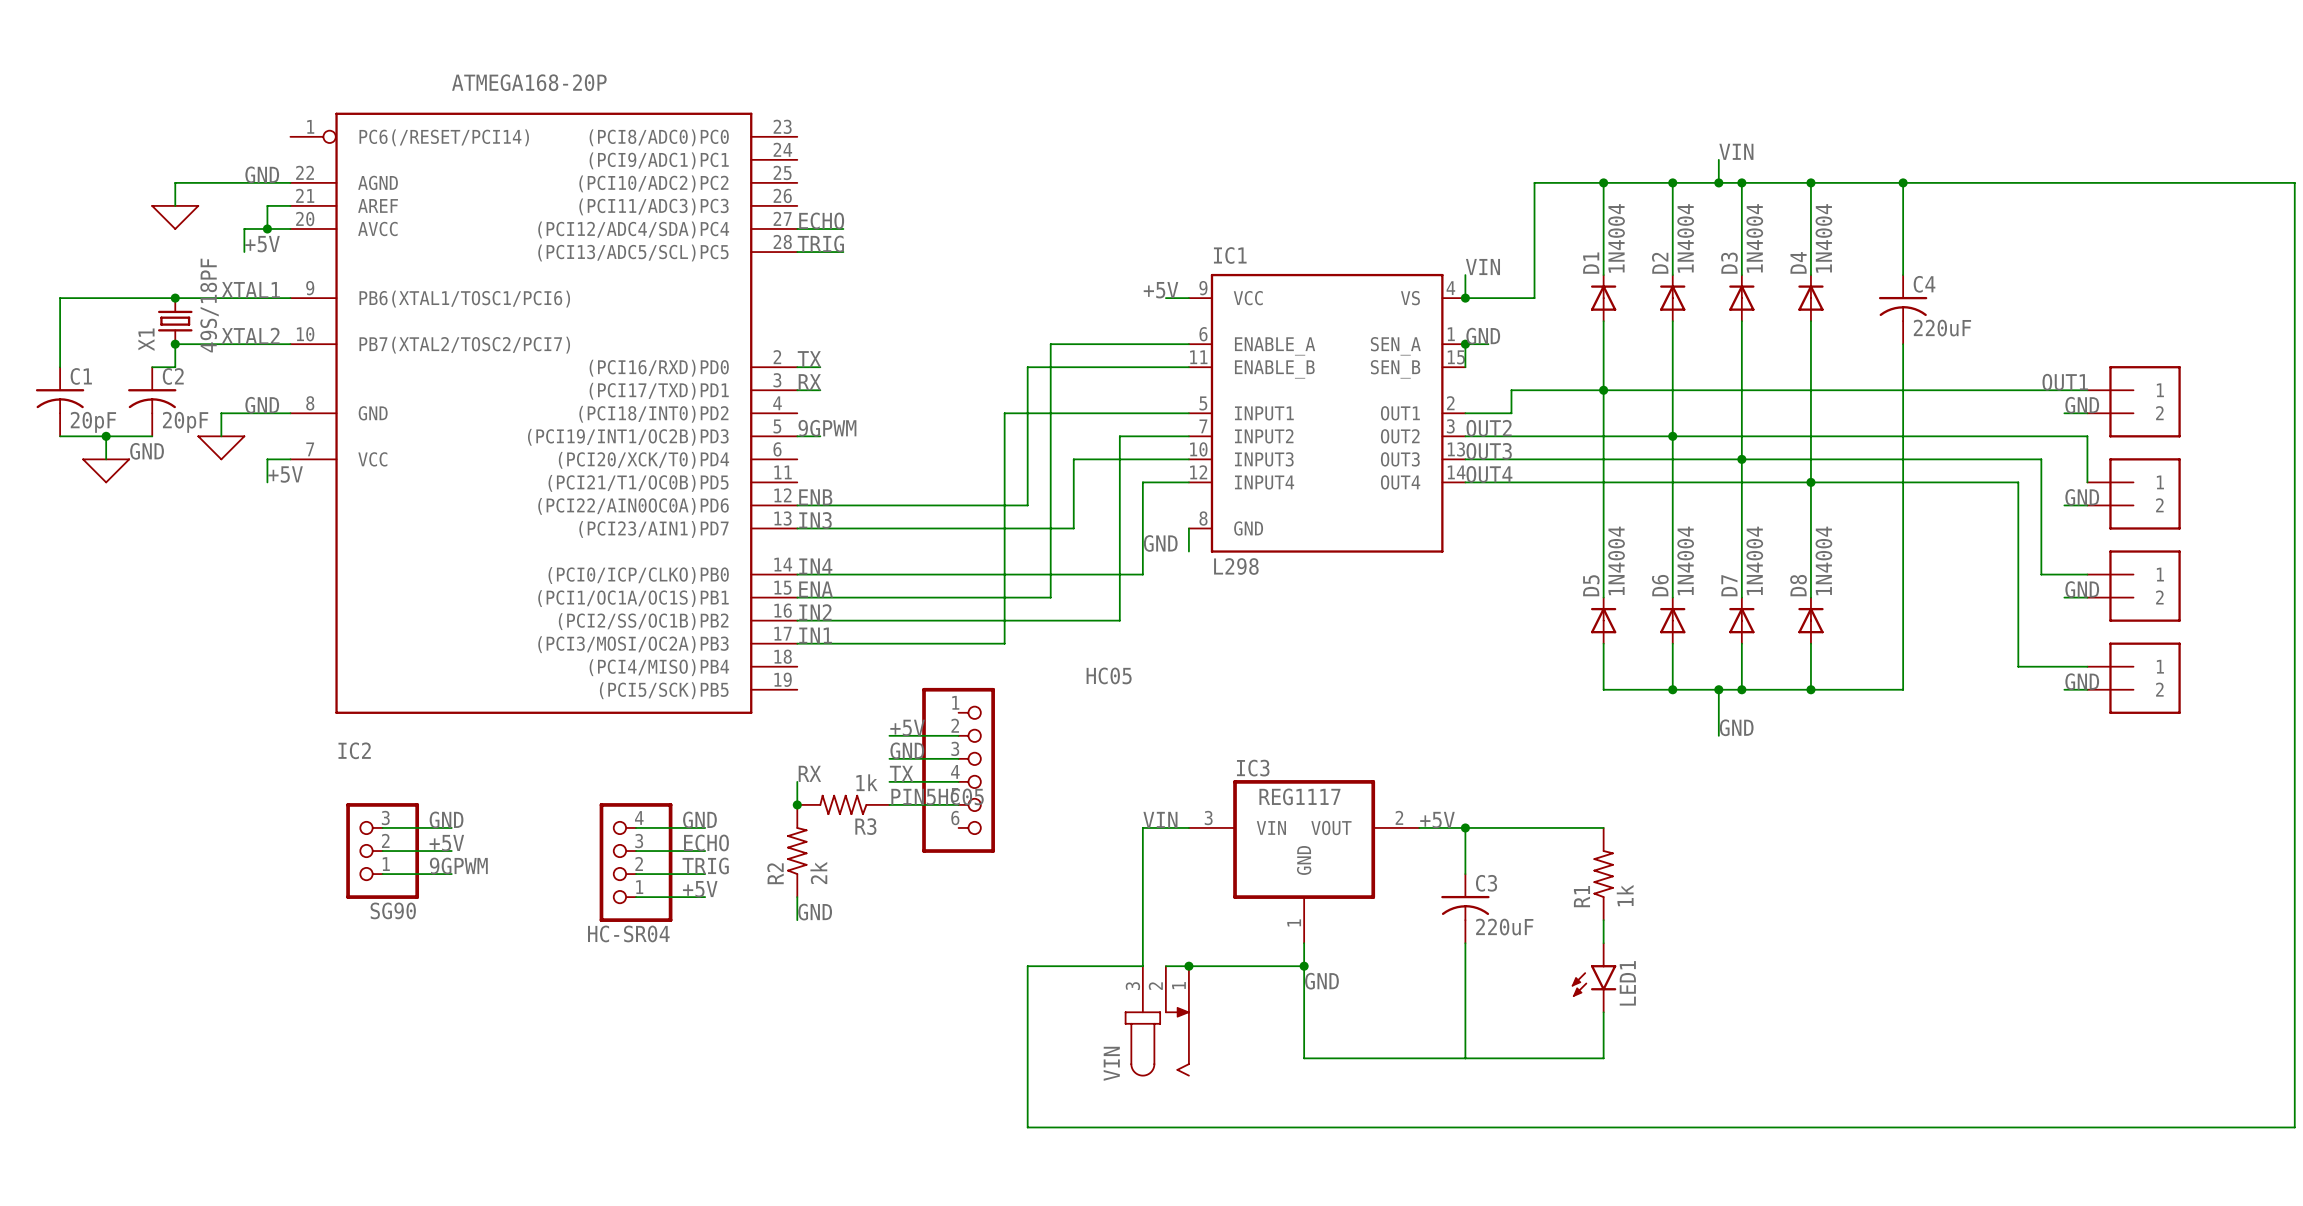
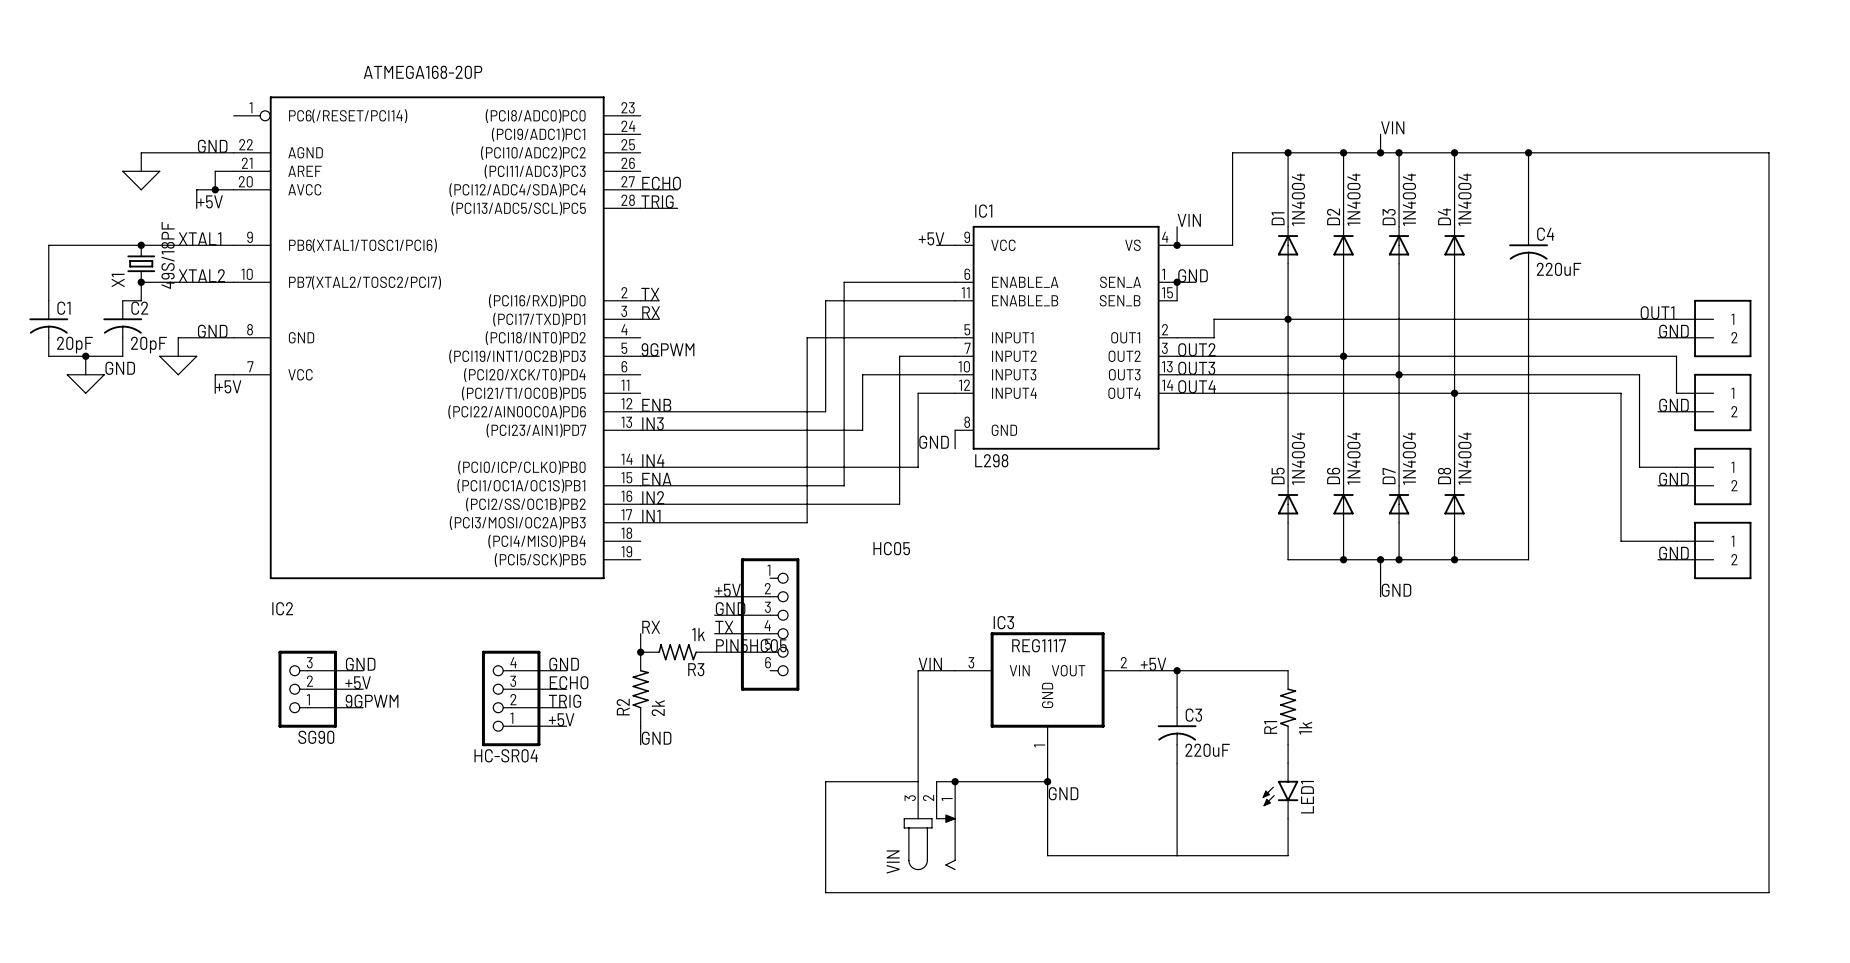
wire: (2202, 182) (2294, 182) (2294, 1127) (1027, 1127) (1027, 1104) -> (1769, 152) (1769, 892) (825, 892)

